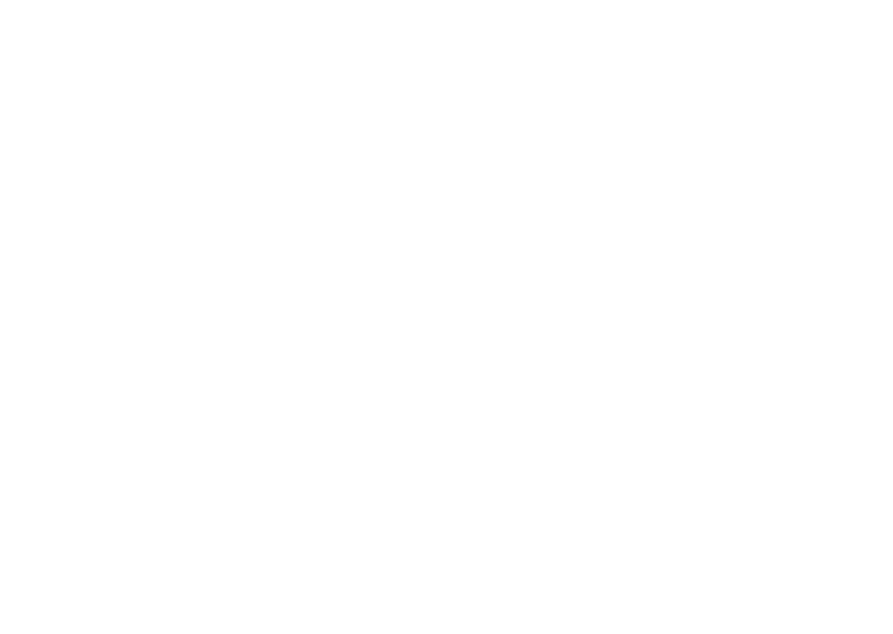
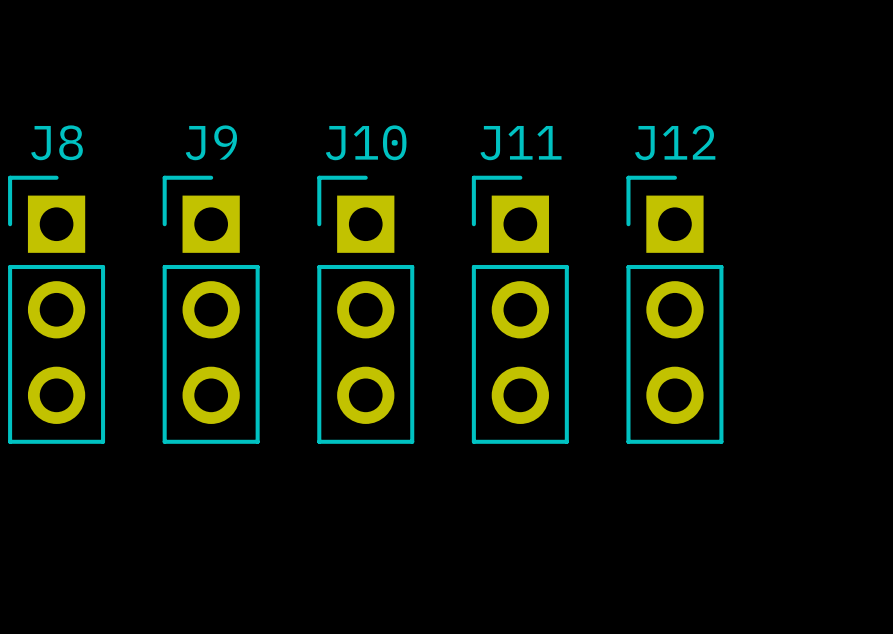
J8: none -> (56, 309)
J9: none -> (211, 309)
J10: none -> (365, 309)
J11: none -> (520, 309)
J12: none -> (674, 309)

